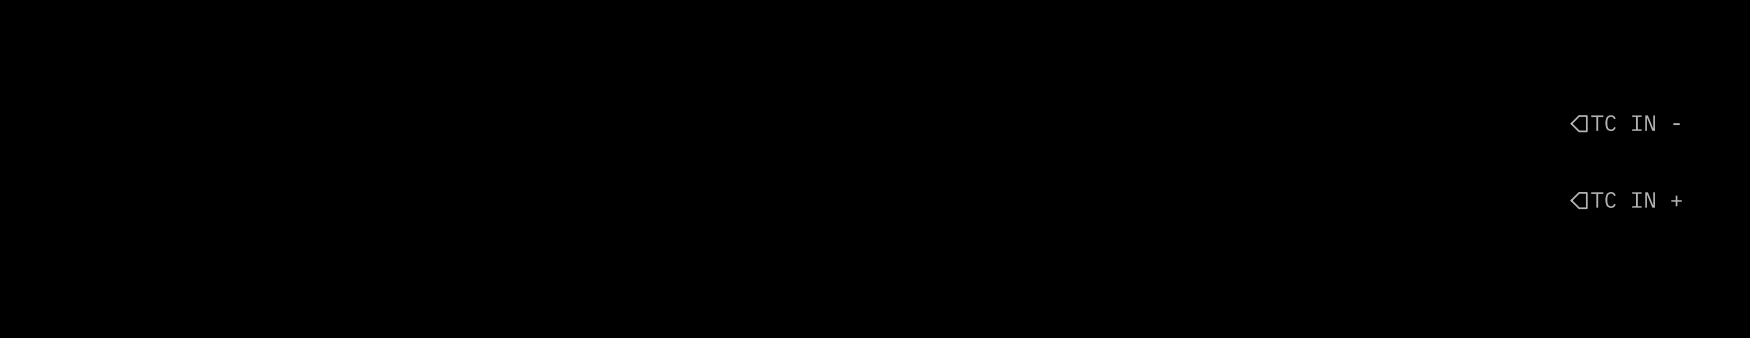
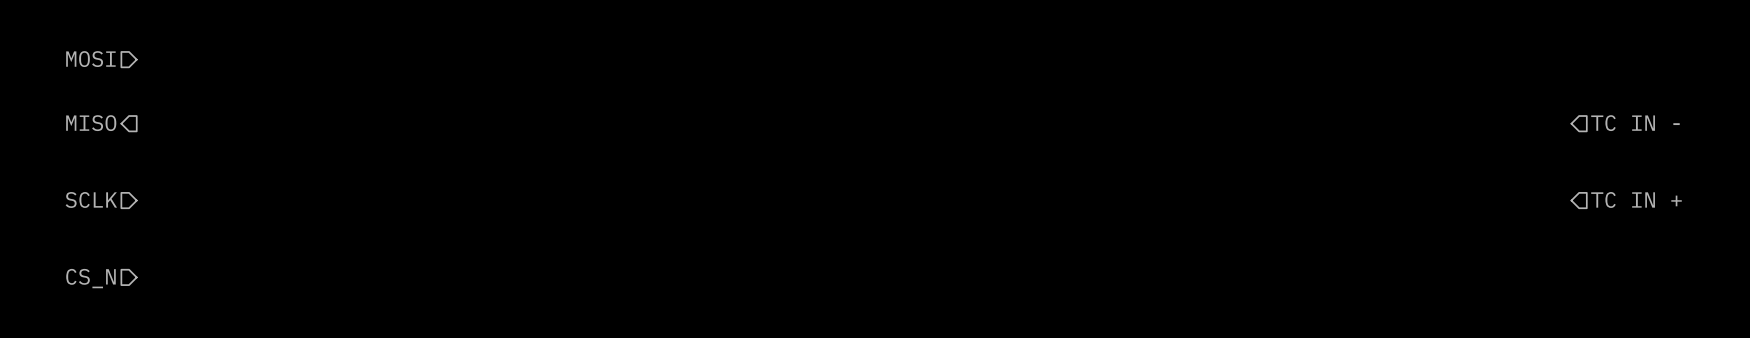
hierarchical label: none -> MOSI (90, 59)
hierarchical label: none -> MISO (91, 123)
hierarchical label: none -> SCLK (91, 199)
hierarchical label: none -> CS_N (90, 278)

